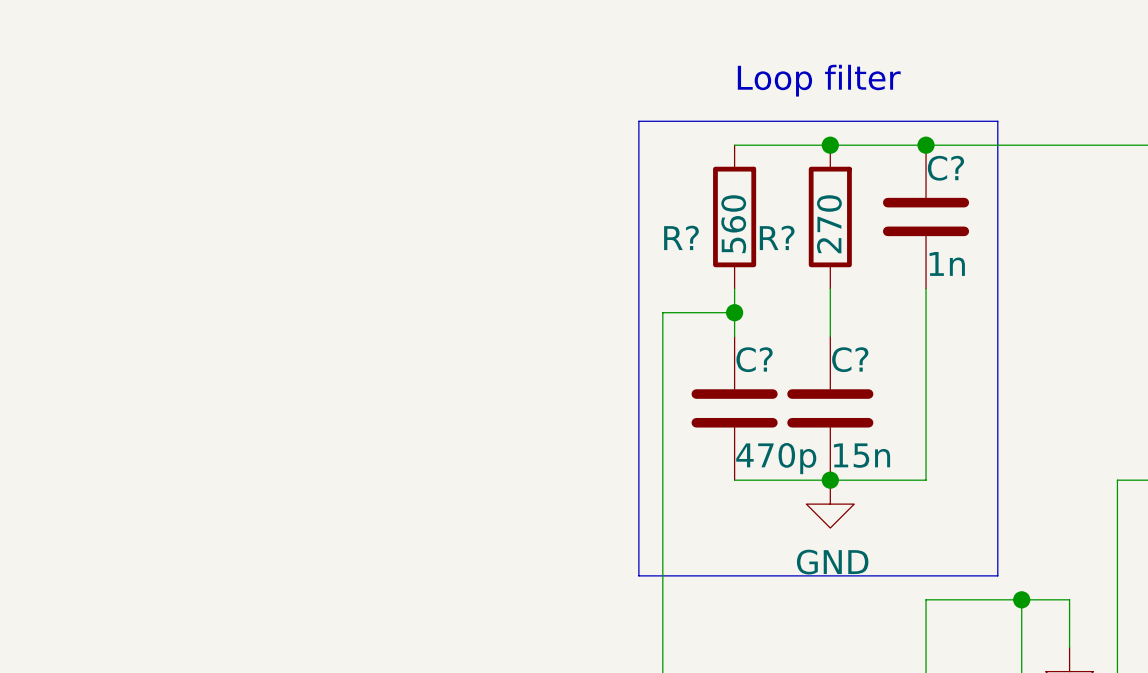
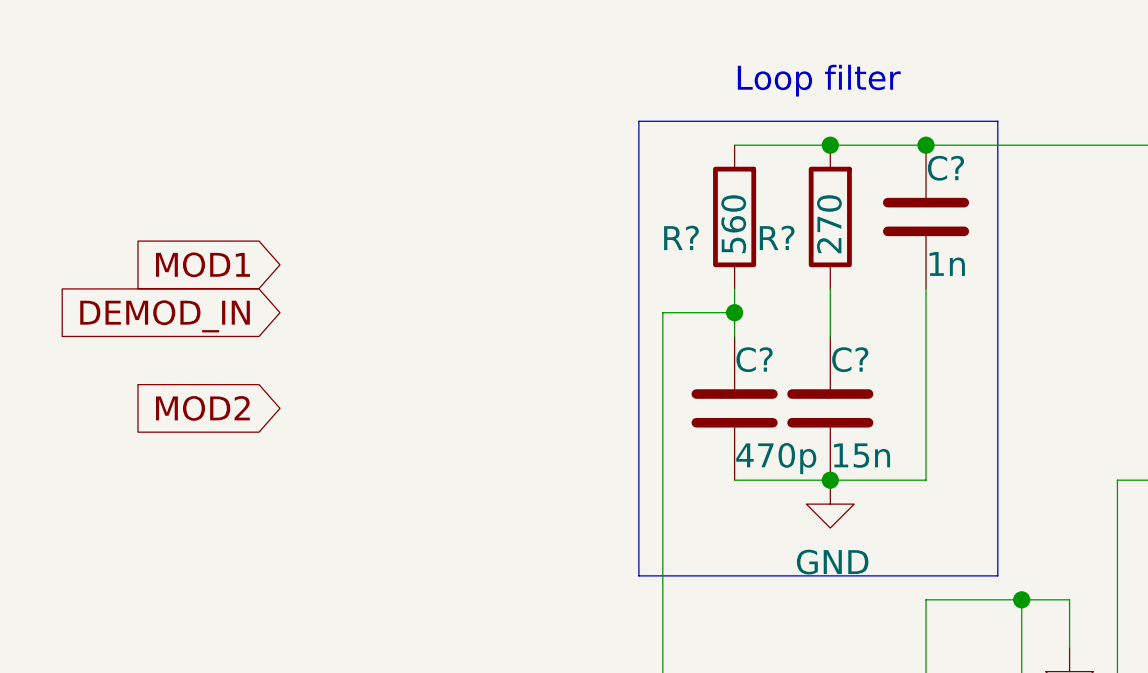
global label: none -> MOD1 (203, 264)
global label: none -> DEMOD_IN (165, 316)
global label: none -> MOD2 (202, 408)

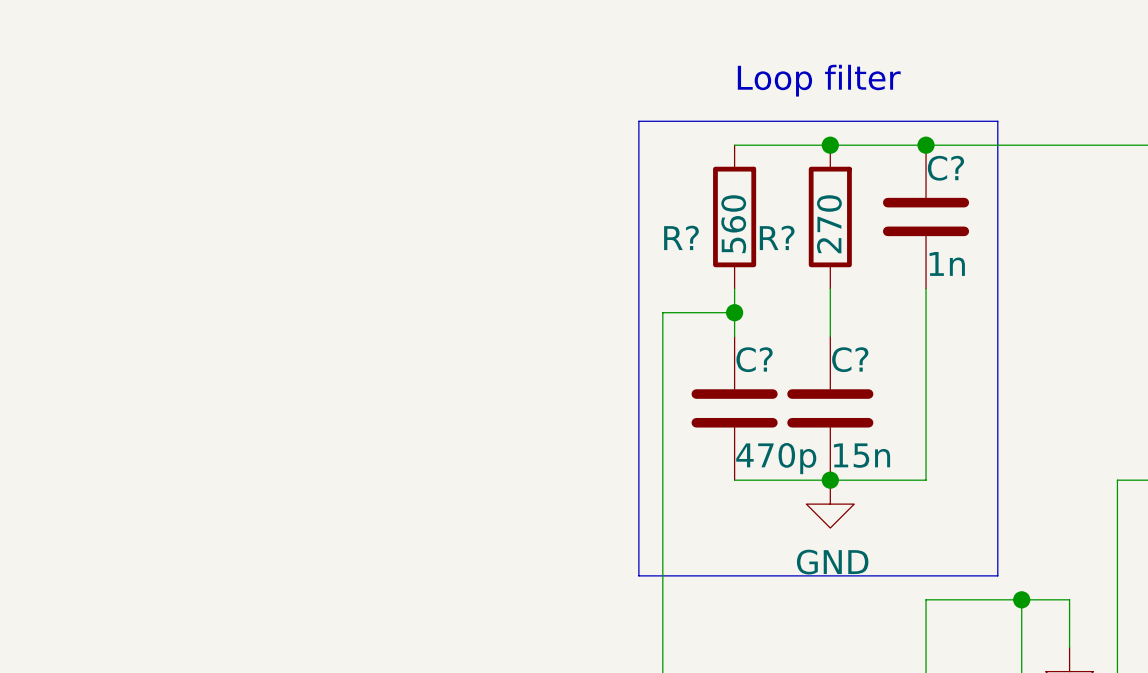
global label: MOD1 (203, 264) -> none
global label: DEMOD_IN (165, 316) -> none
global label: MOD2 (202, 408) -> none

